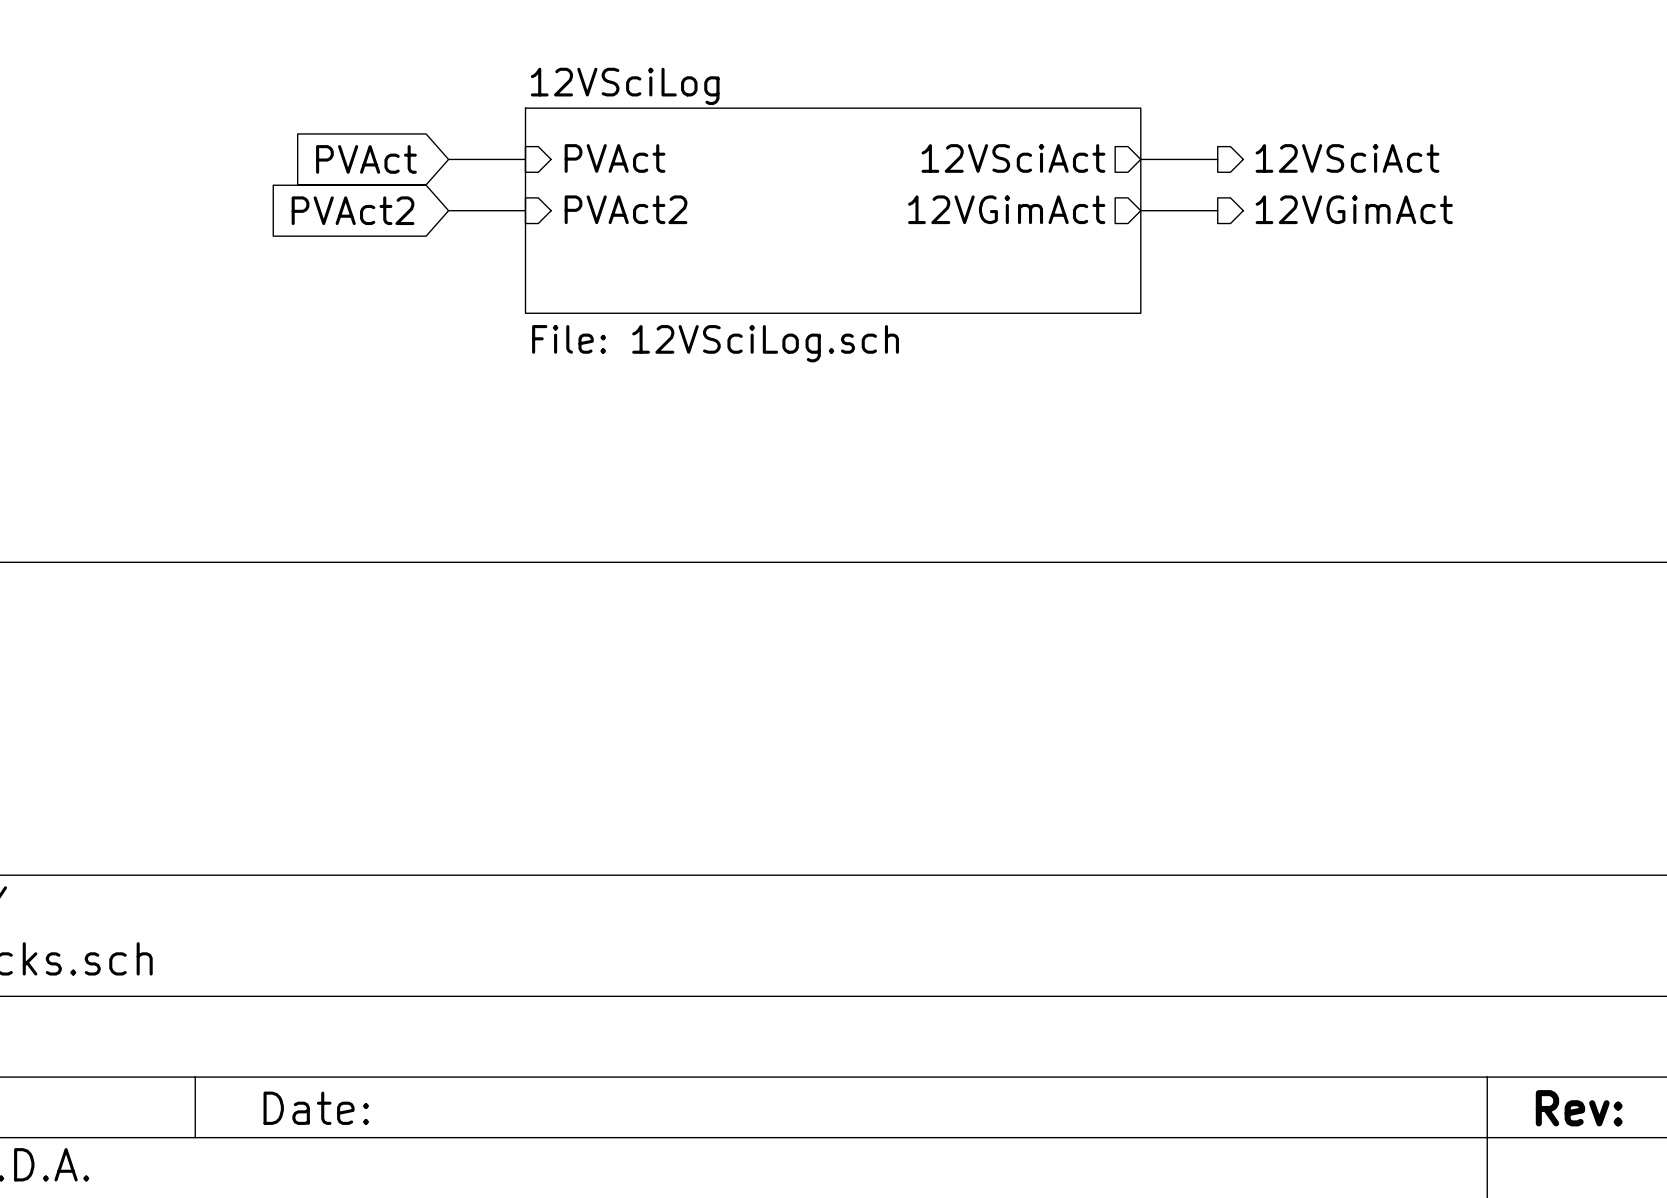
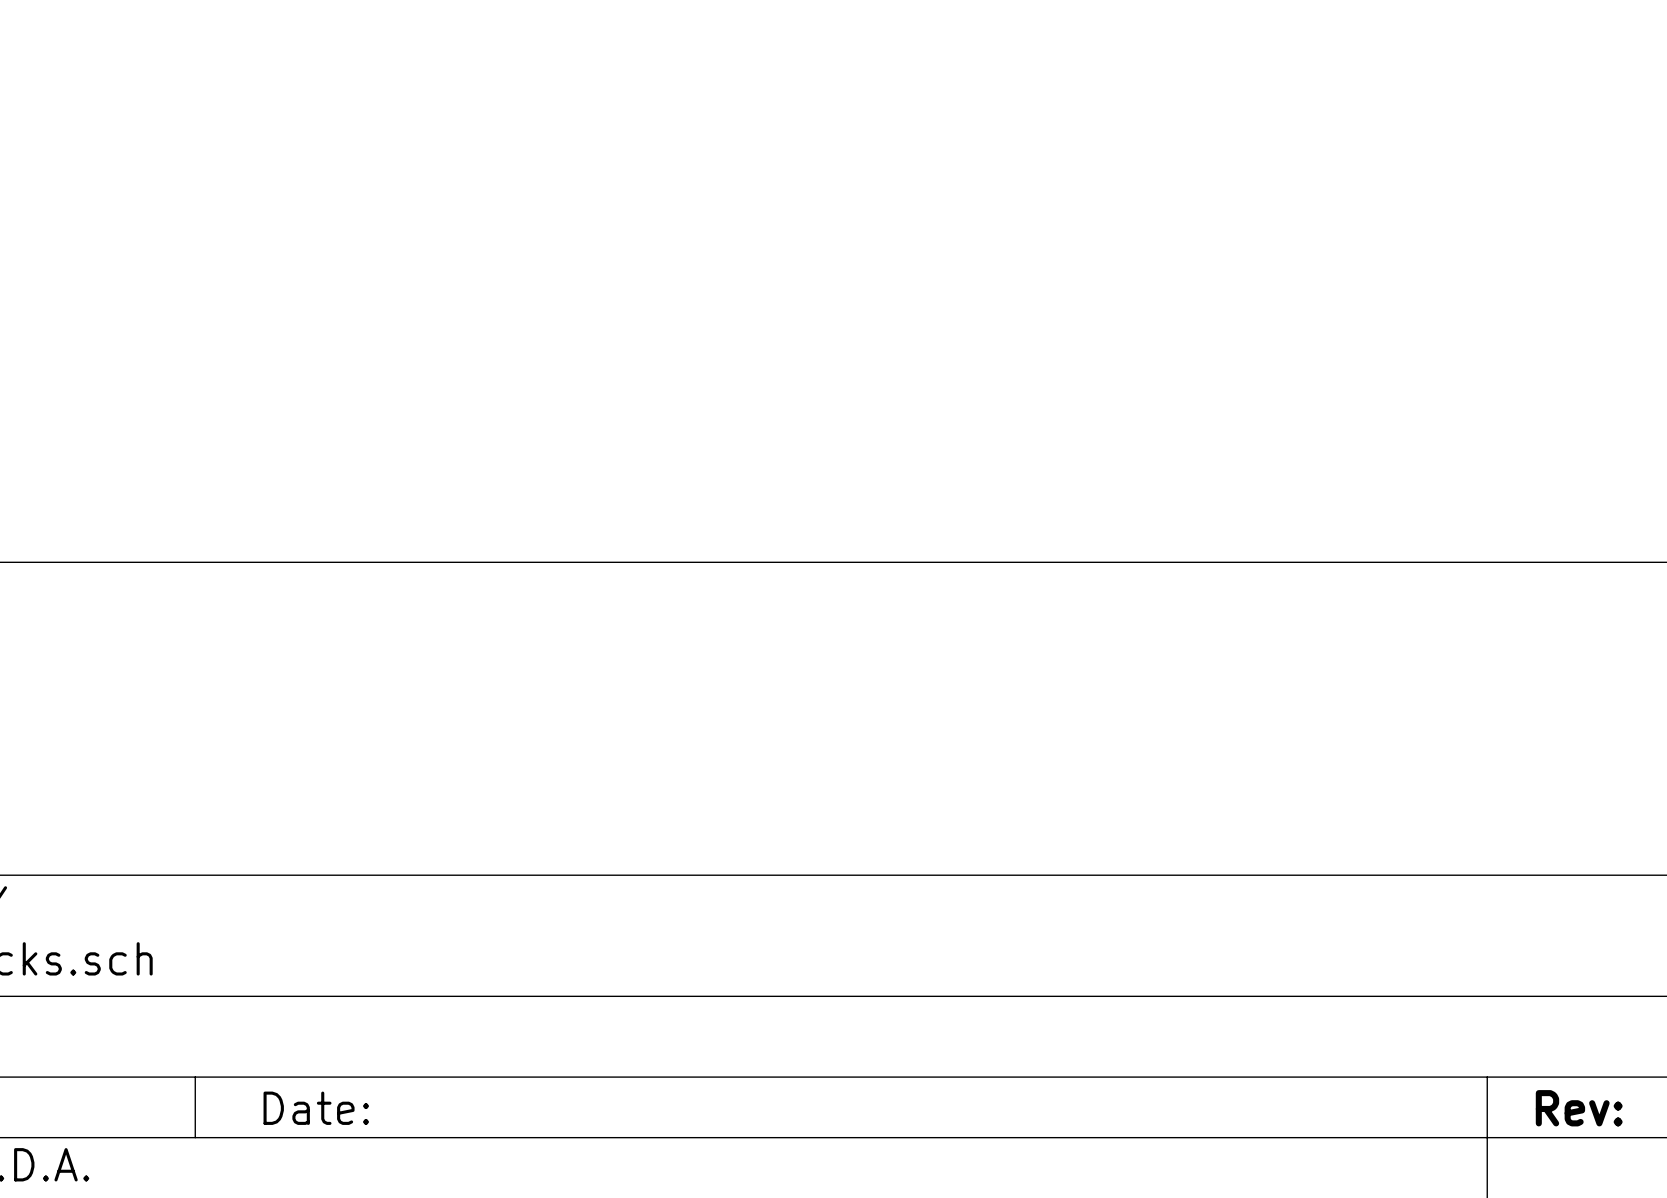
sheet pin: PVAct (615, 158) -> none
sheet pin: 12VSciAct (1013, 158) -> none
hierarchical label: 12VSciAct (1347, 158) -> none
global label: PVAct (366, 159) -> none
wire: (448, 159) (525, 159) -> none
wire: (1140, 159) (1217, 159) -> none
sheet pin: PVAct2 (626, 209) -> none
sheet pin: 12VGimAct (1006, 209) -> none
hierarchical label: 12VGimAct (1354, 209) -> none
global label: PVAct2 (353, 210) -> none
wire: (448, 210) (525, 210) -> none
sheet 12VSciLog: File: 12VSciLog.sch (833, 210) -> none
wire: (1140, 210) (1217, 210) -> none

